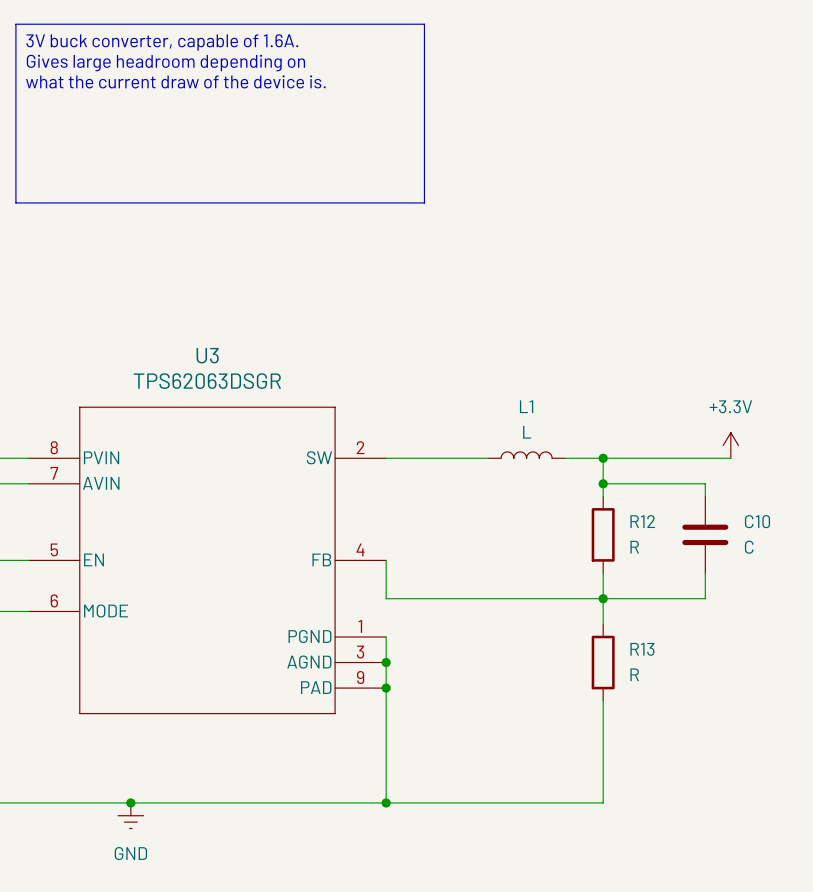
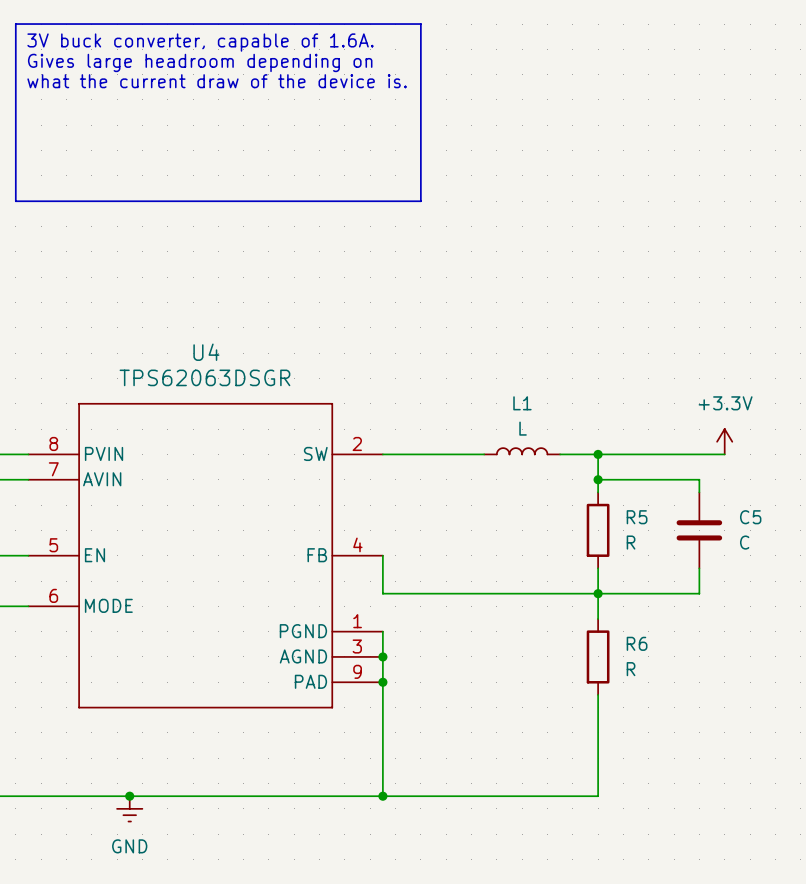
U3 name: U3 (207, 355) -> U4 (206, 352)
R12 name: R12 (642, 521) -> R5 (637, 517)
C10 name: C10 (757, 521) -> C5 (750, 517)
R13 name: R13 (642, 649) -> R6 (637, 643)

